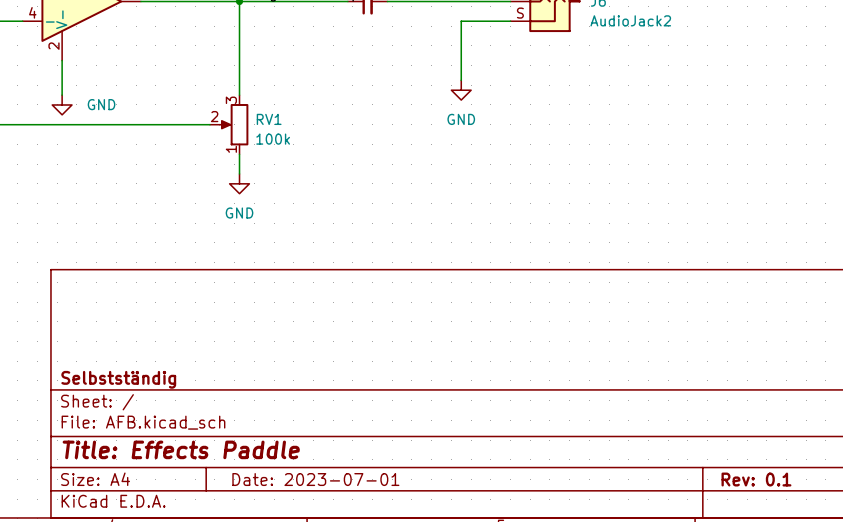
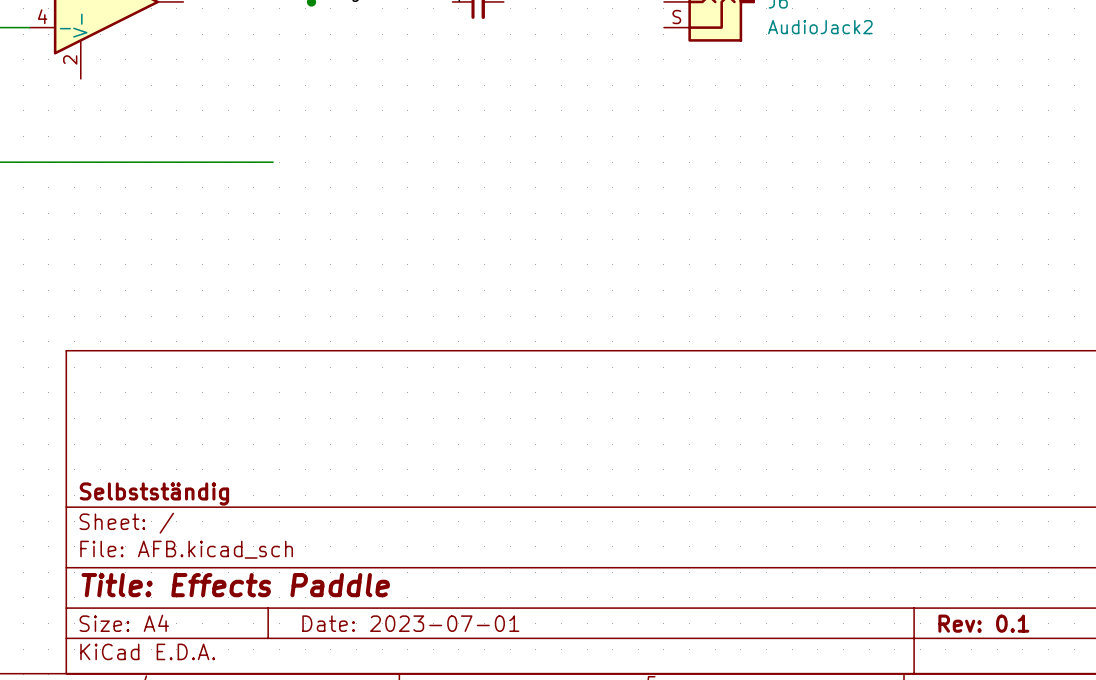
wire: (140, 1) (347, 1) -> none
wire: (239, 1) (239, 95) -> none
wire: (387, 1) (510, 1) -> none
wire: (510, 21) (461, 21) (461, 80) -> none
wire: (62, 60) (62, 95) -> none
power symbol: GND (461, 90) -> none
power symbol: GND (62, 104) -> none
RV1: 100k (229, 124) -> none
wire: (239, 154) (239, 173) -> none
power symbol: GND (239, 183) -> none

